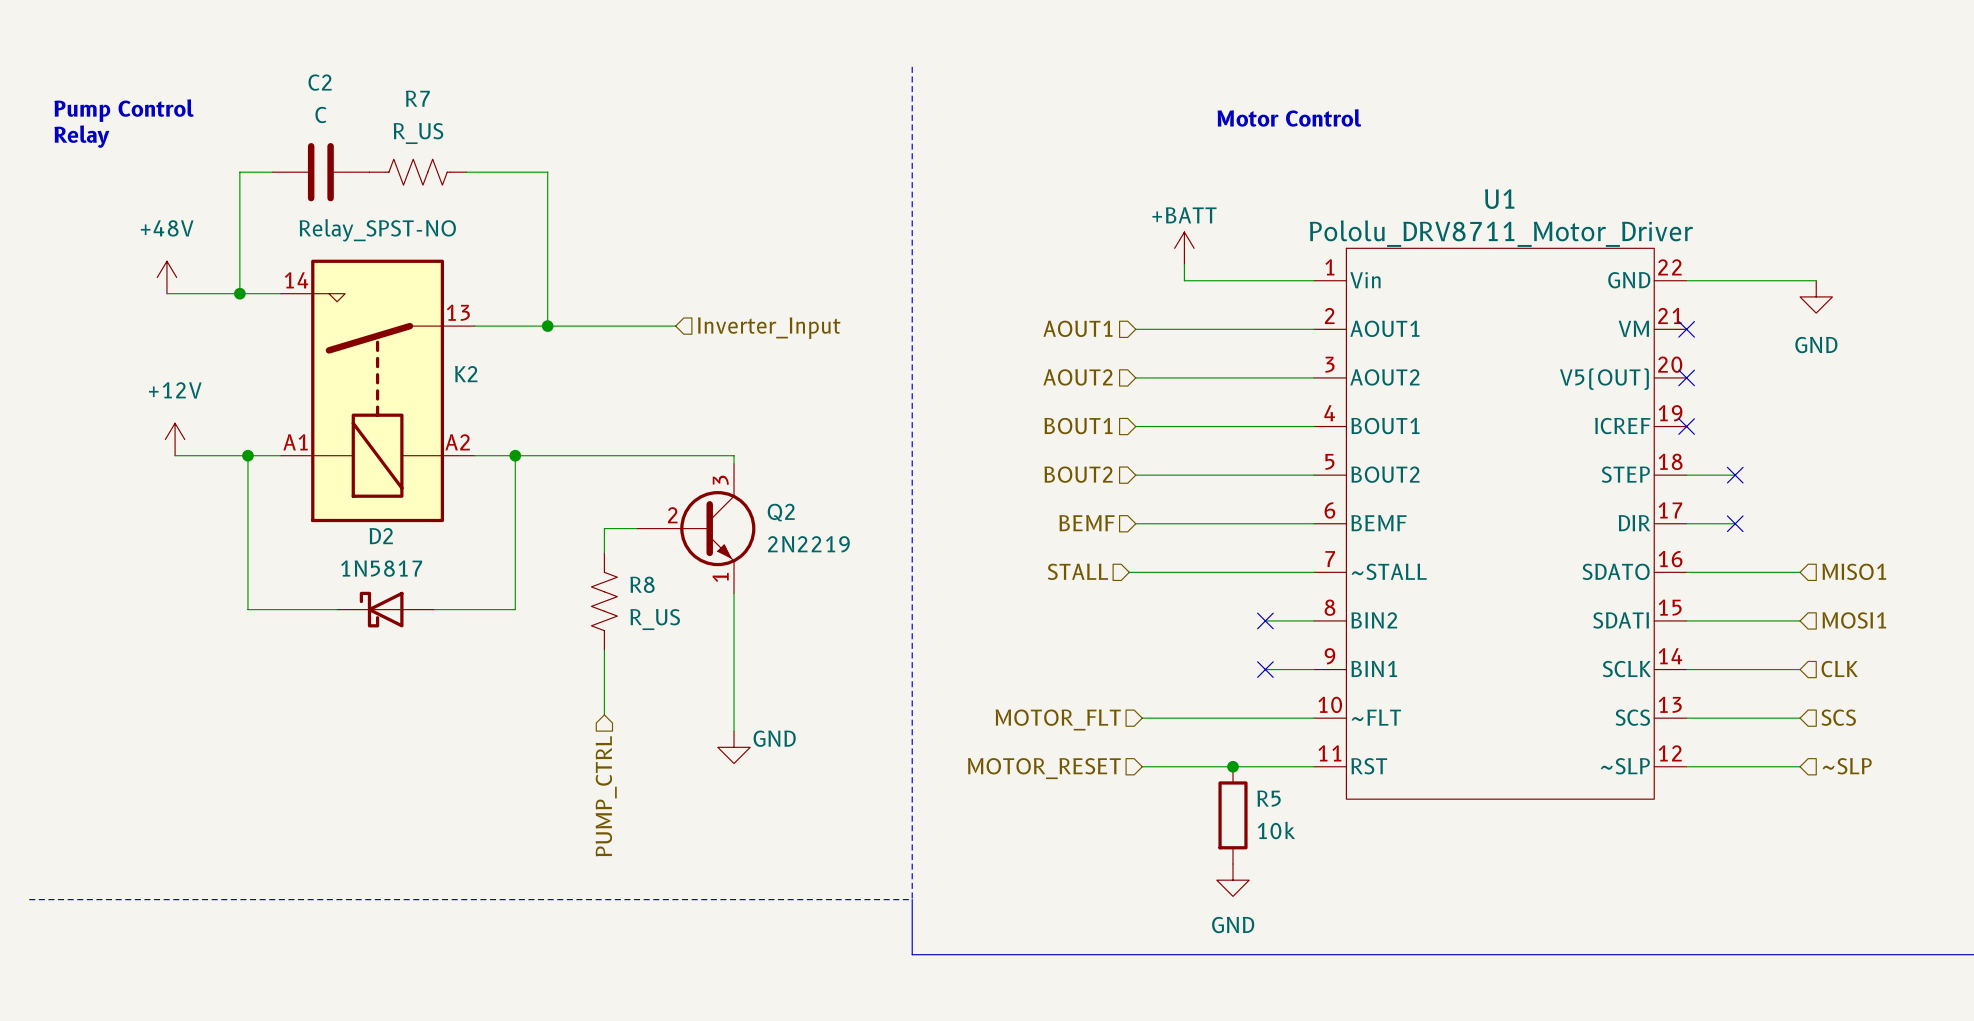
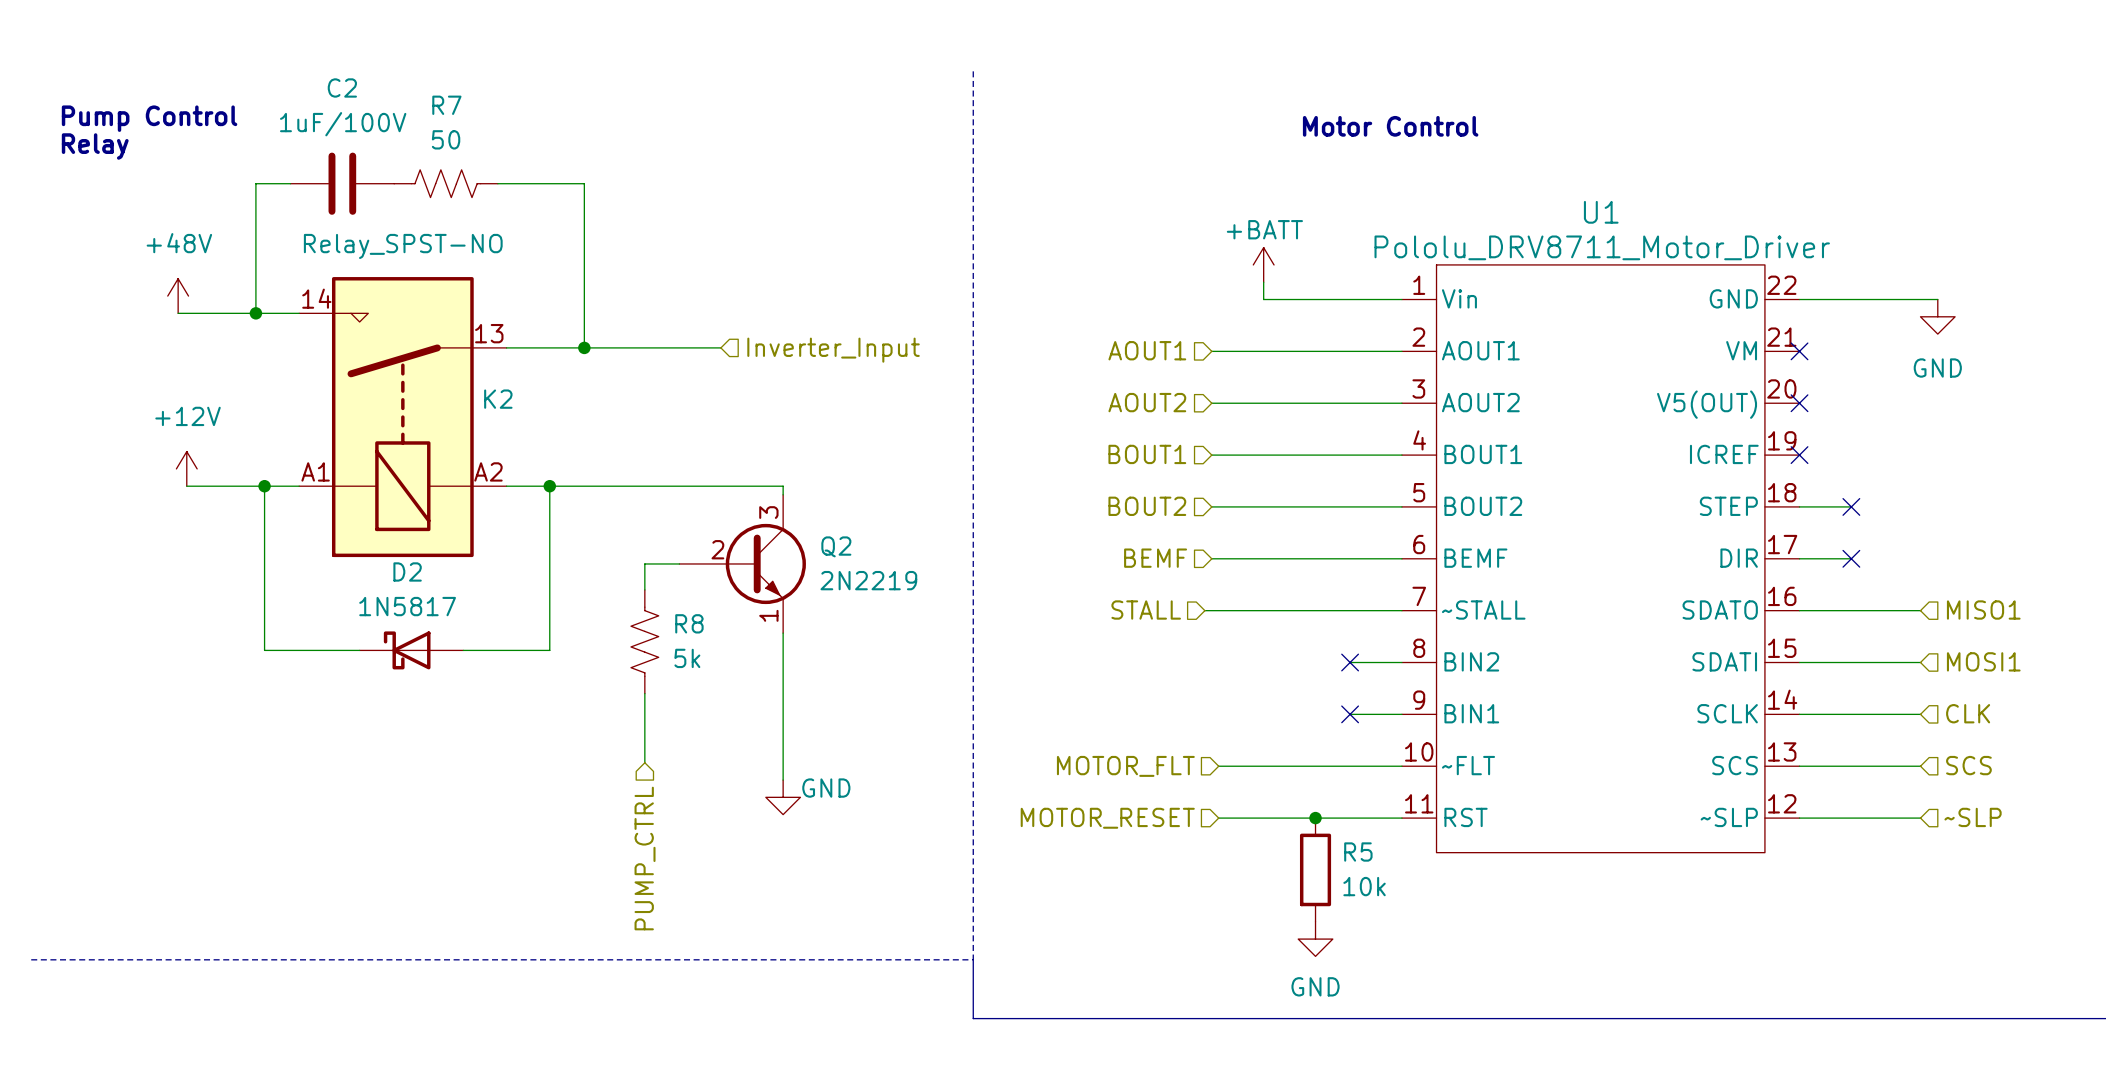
C2 value: C (320, 114) -> 1uF/100V (343, 124)
R7 value: R_US (418, 133) -> 50 (446, 139)
R8 value: R_US (655, 619) -> 5k (687, 658)

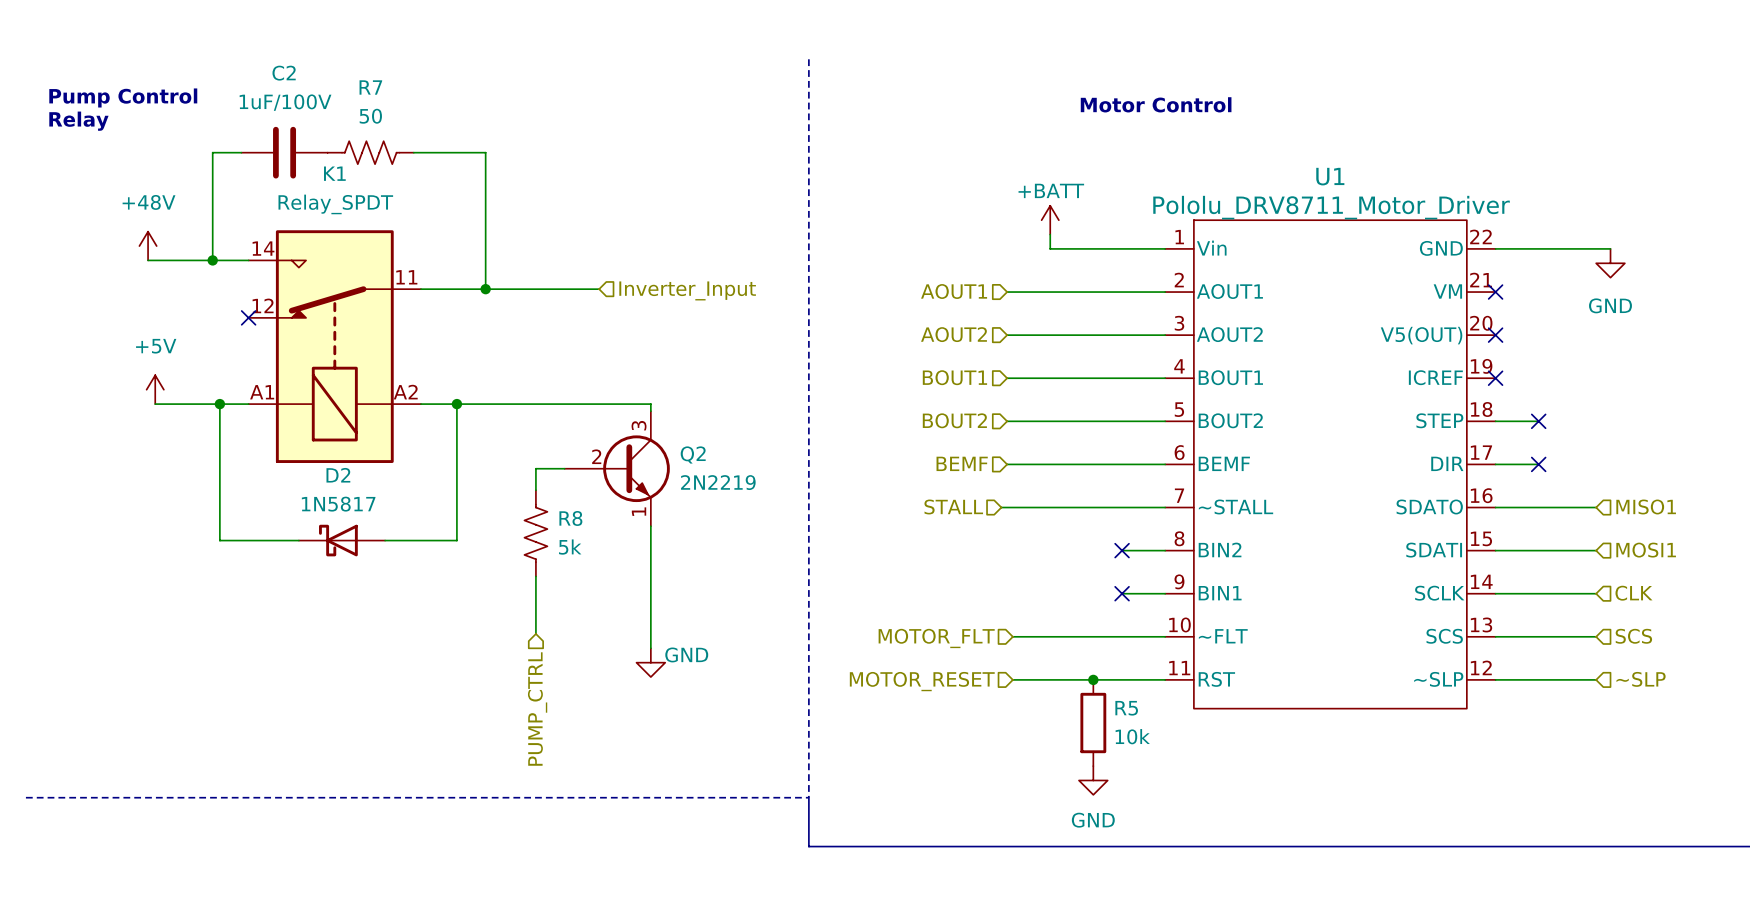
no-connect mark: none -> (248, 317)
K2: Relay_SPST-NO (402, 417) -> none
K1: none -> Relay_SPDT (334, 346)
power symbol: +12V (186, 468) -> +5V (155, 389)

